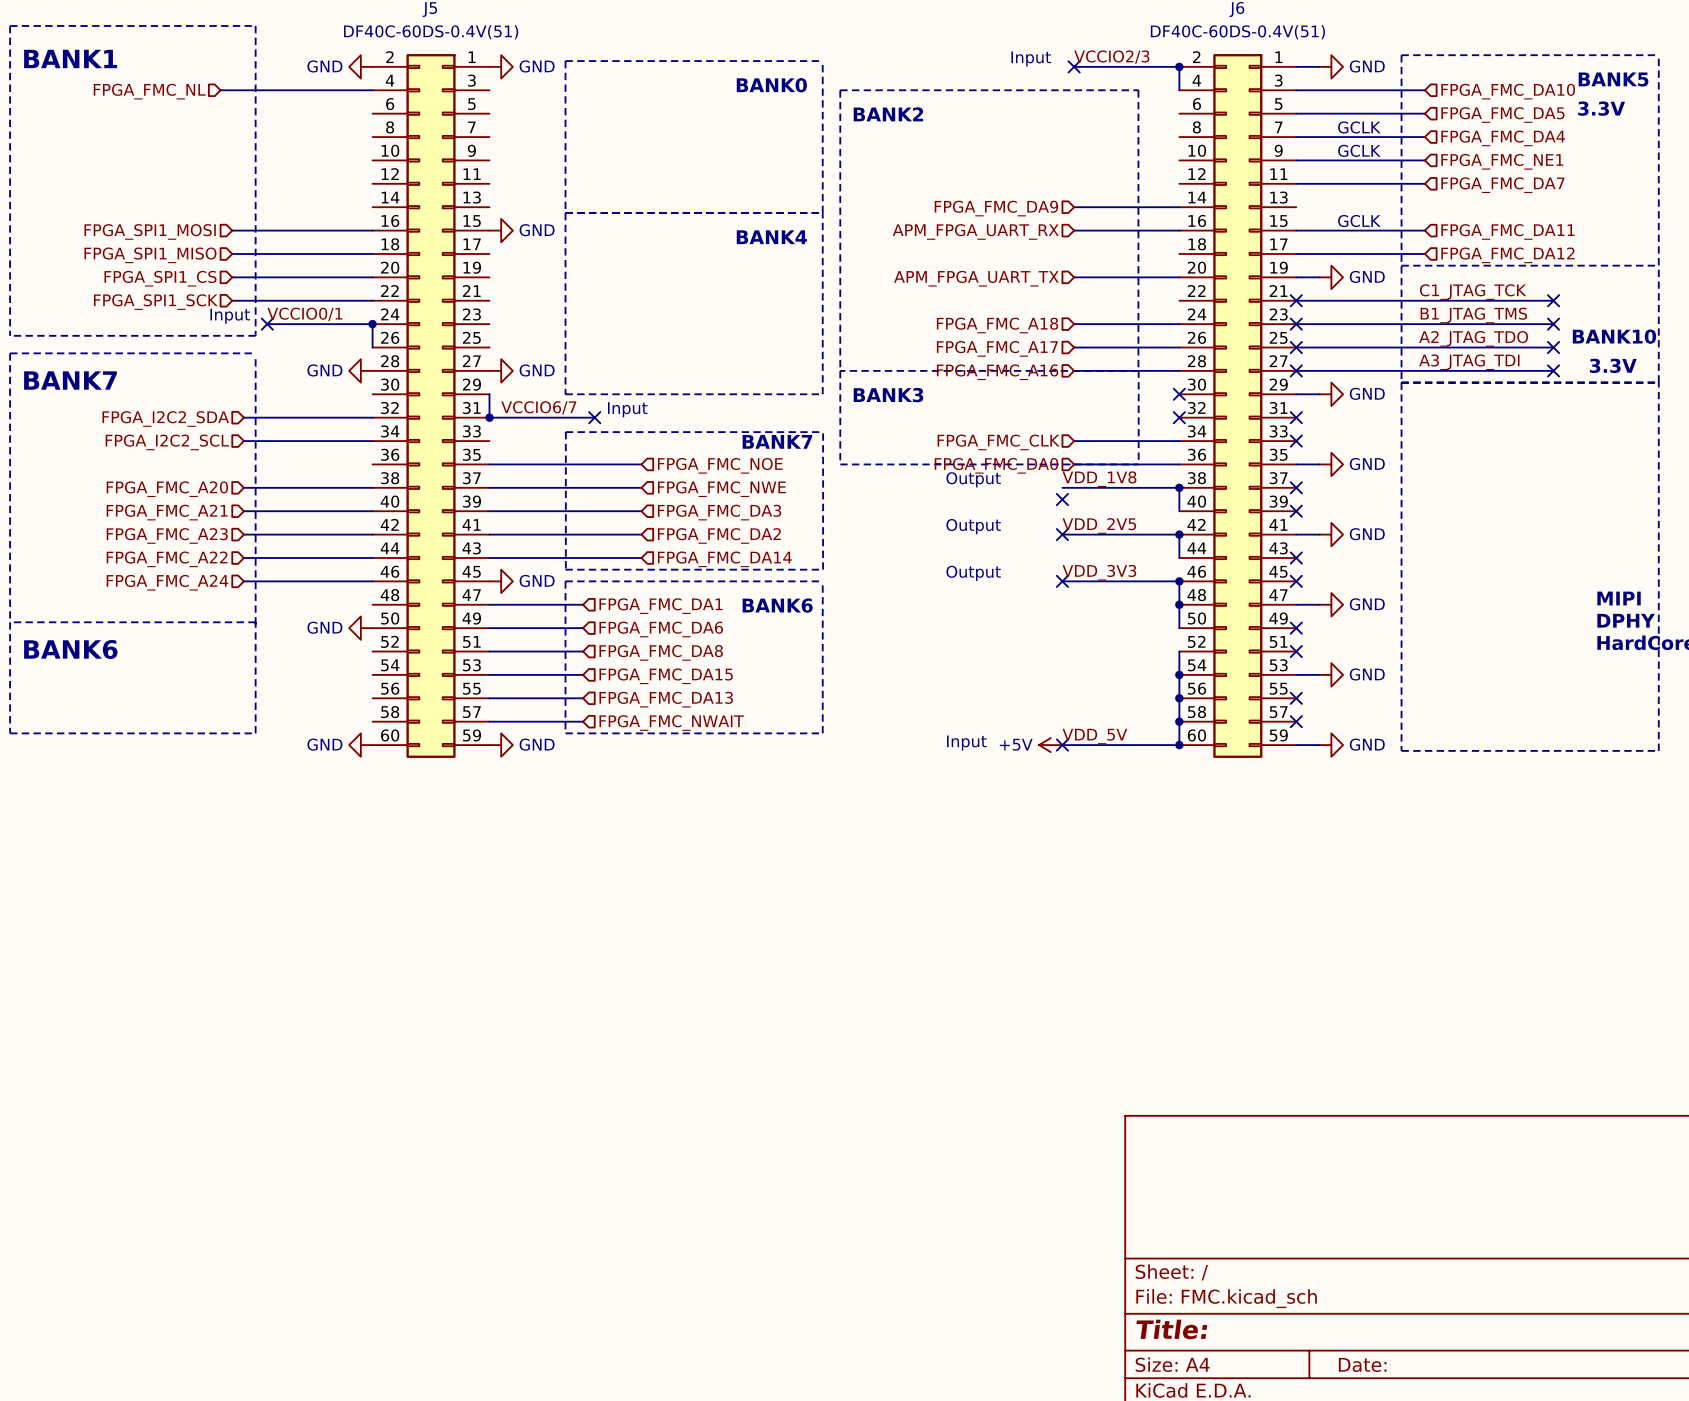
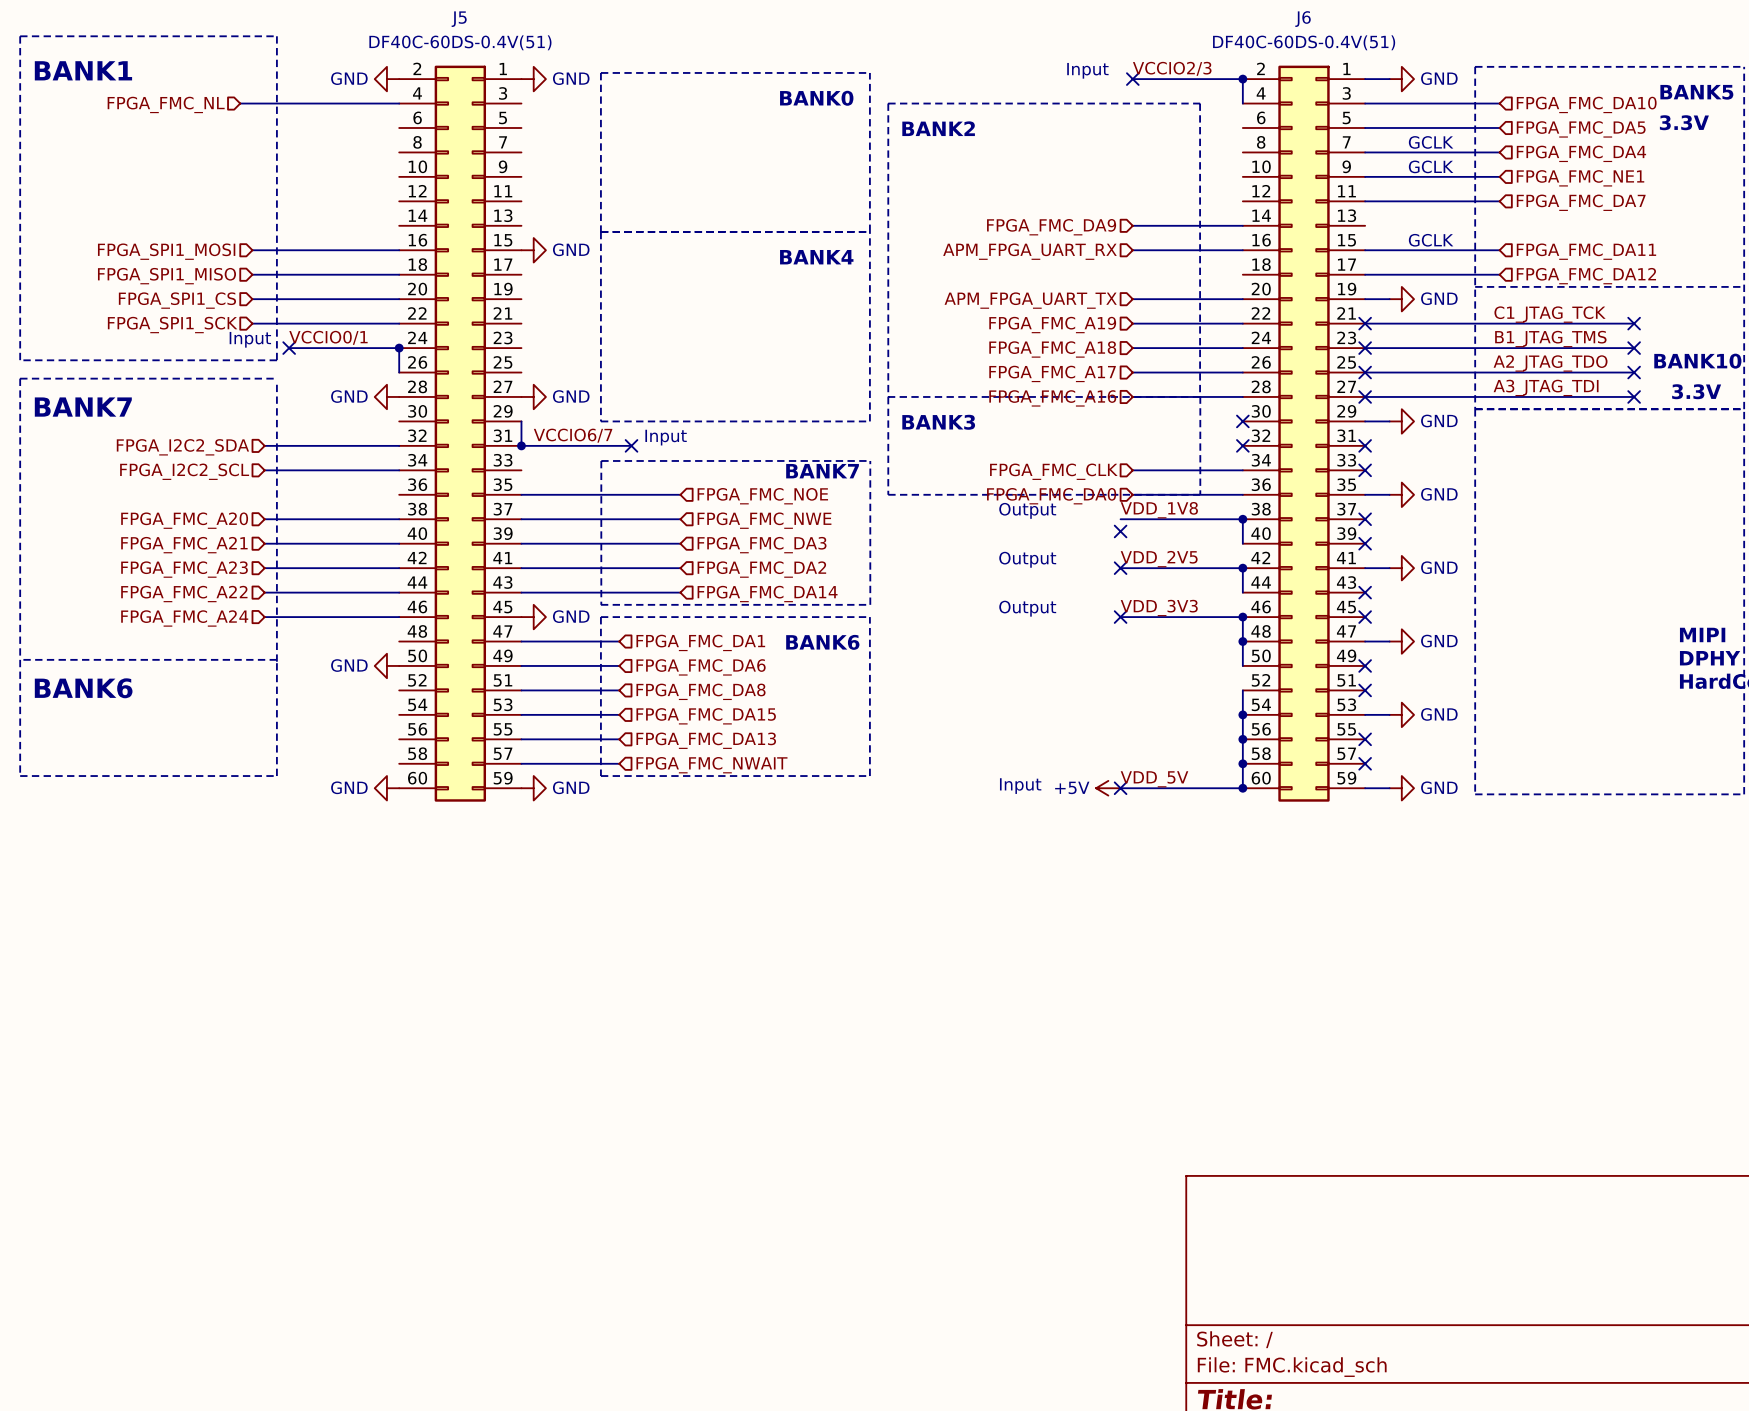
wire: none -> (1132, 323) (1242, 323)
hierarchical label: none -> FPGA_FMC_A19 (1052, 325)

